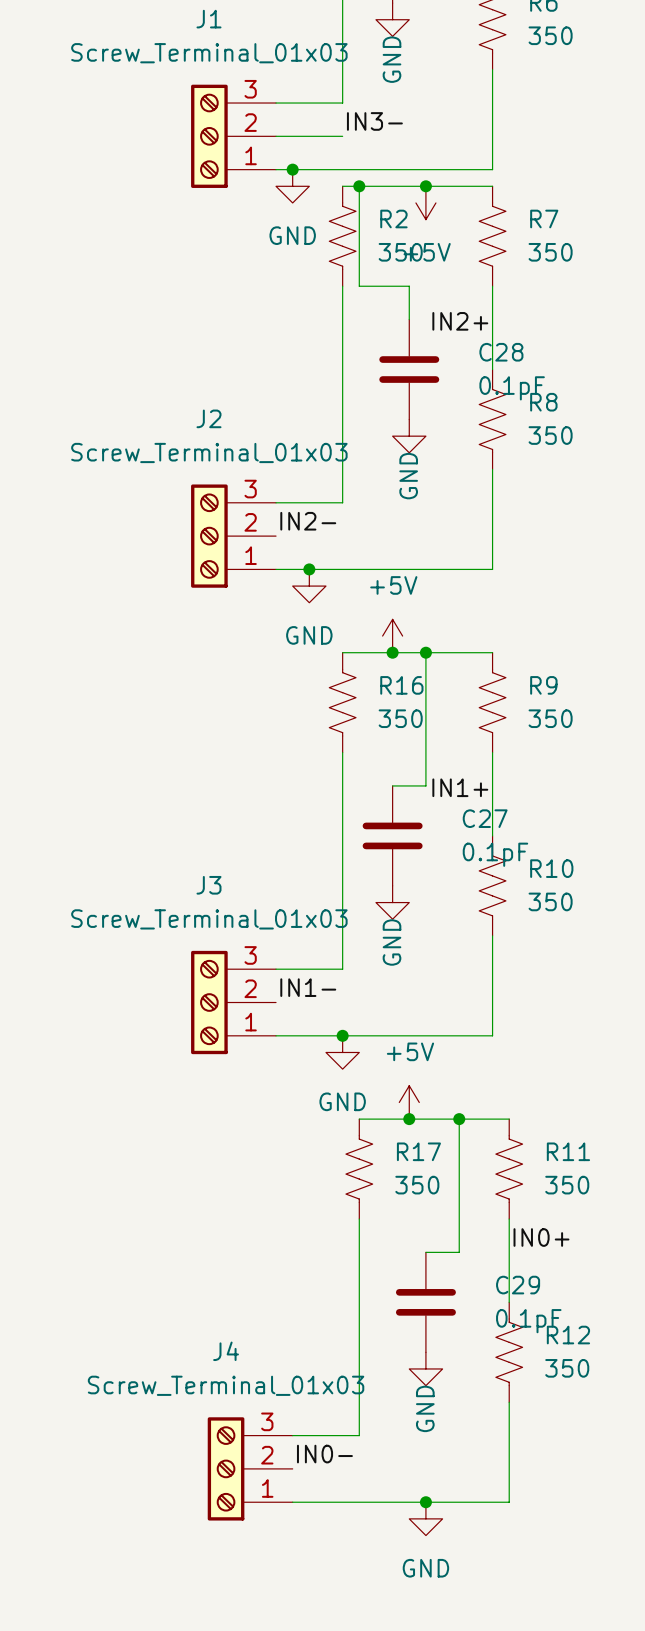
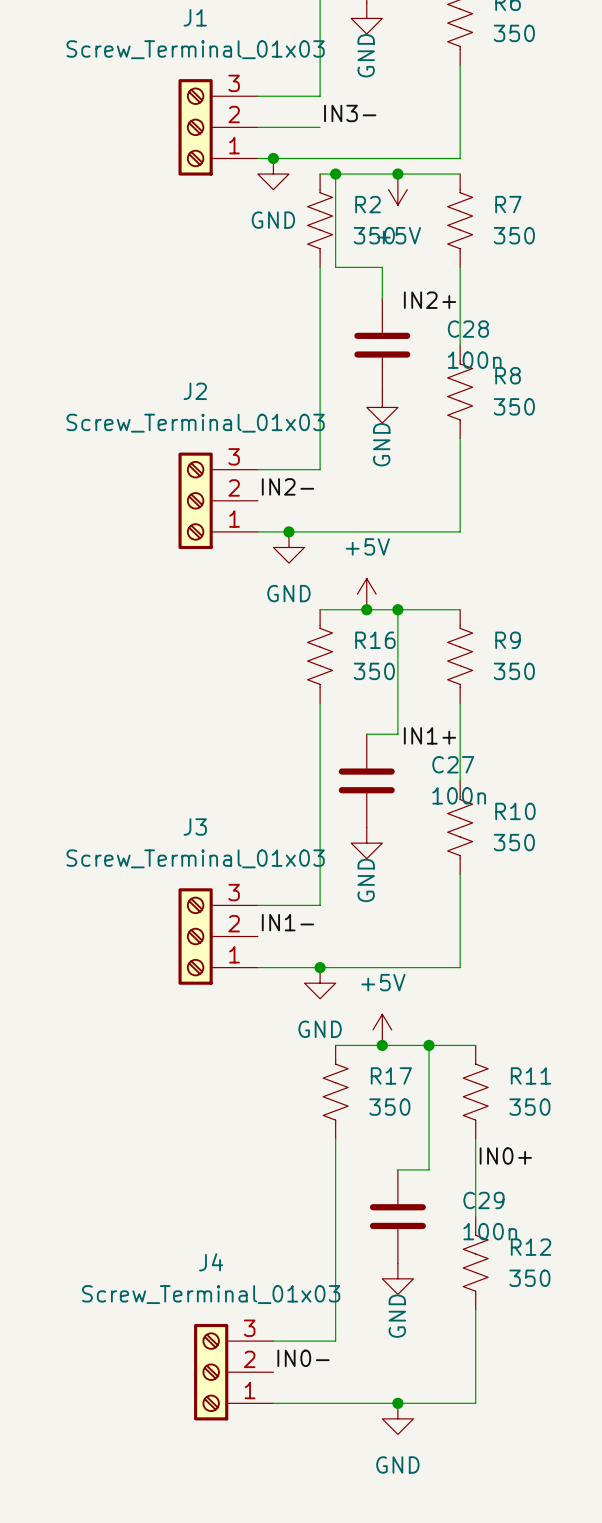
C28 value: 0.1pF (512, 388) -> 100n (474, 360)
C27 value: 0.1pF (495, 854) -> 100n (459, 795)
C29 value: 0.1pF (528, 1321) -> 100n (490, 1231)

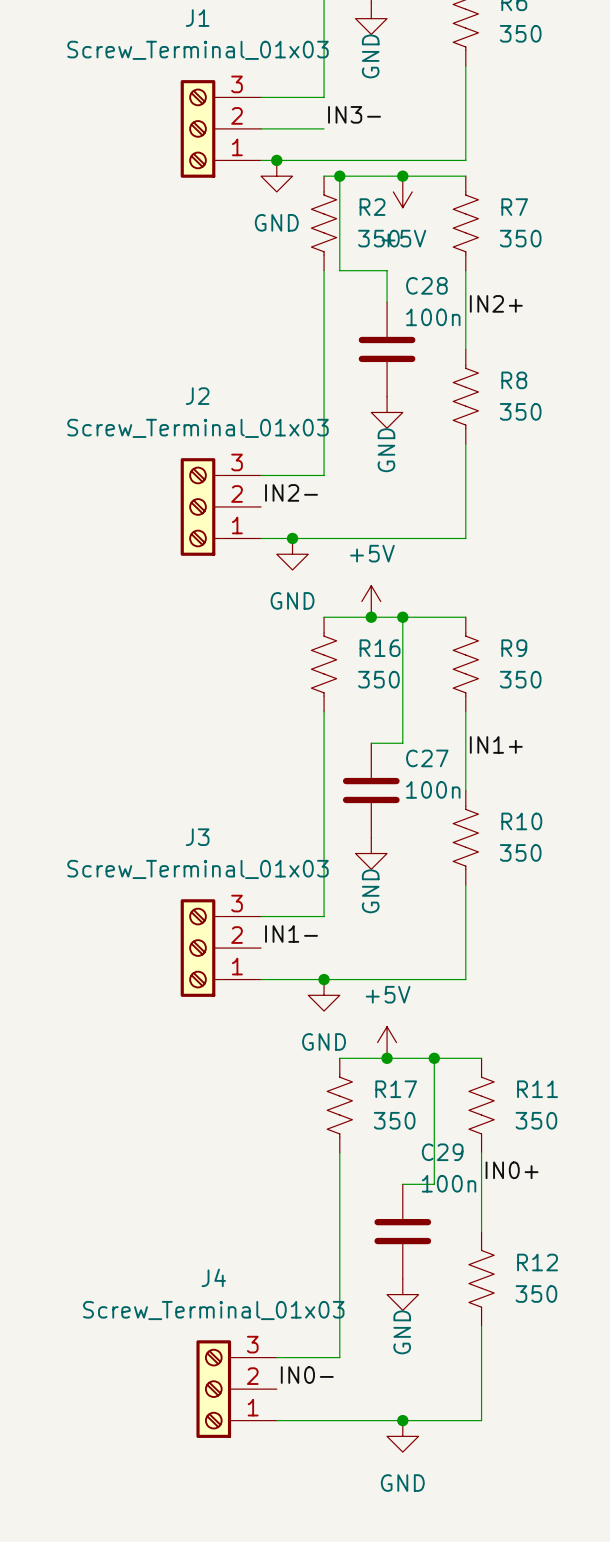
label position: IN2+ (430, 300) -> IN2+ (496, 303)
C28 name position: C28 (468, 329) -> C28 (426, 285)
C28 value position: 100n (474, 360) -> 100n (433, 317)
label position: IN1+ (430, 735) -> IN1+ (496, 744)
C27 name position: C27 (453, 764) -> C27 (427, 758)
C27 value position: 100n (459, 795) -> 100n (433, 789)
C29 name position: C29 (483, 1200) -> C29 (442, 1152)
C29 value position: 100n (490, 1231) -> 100n (449, 1183)

